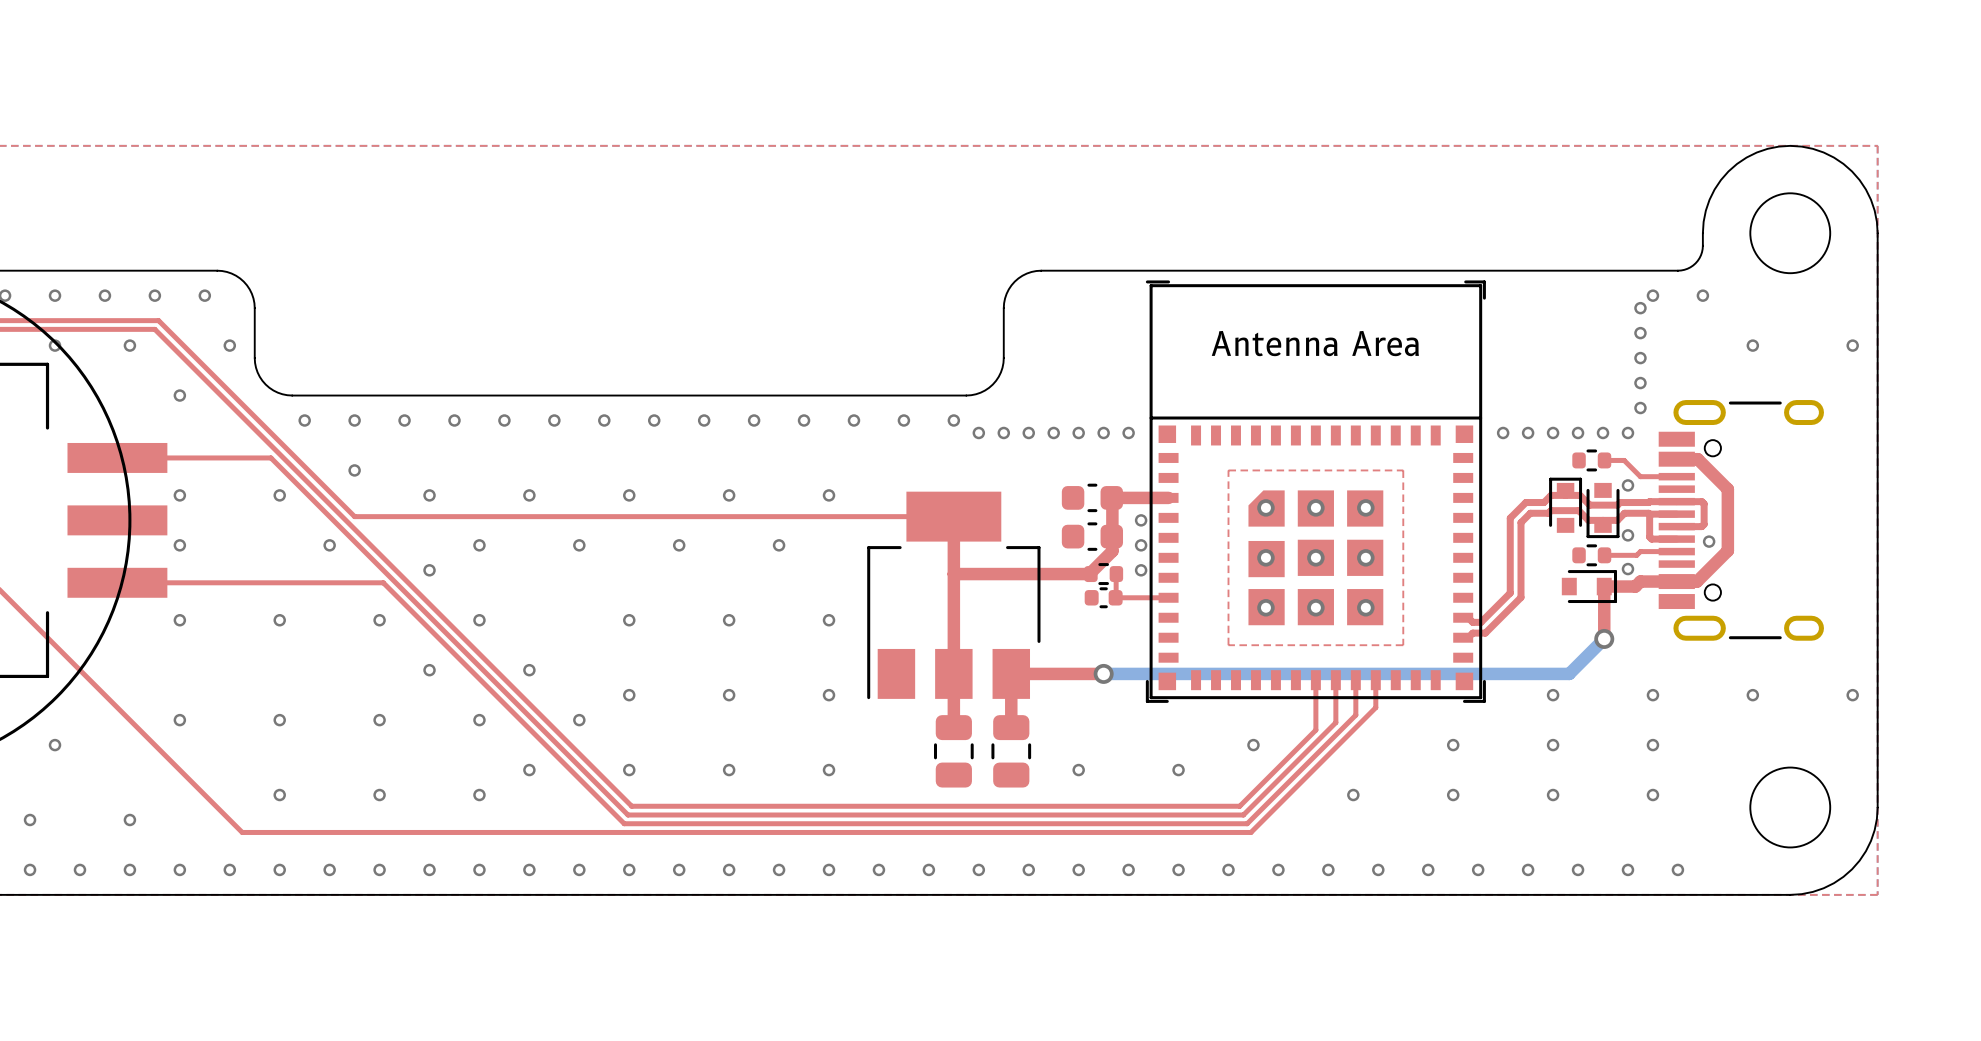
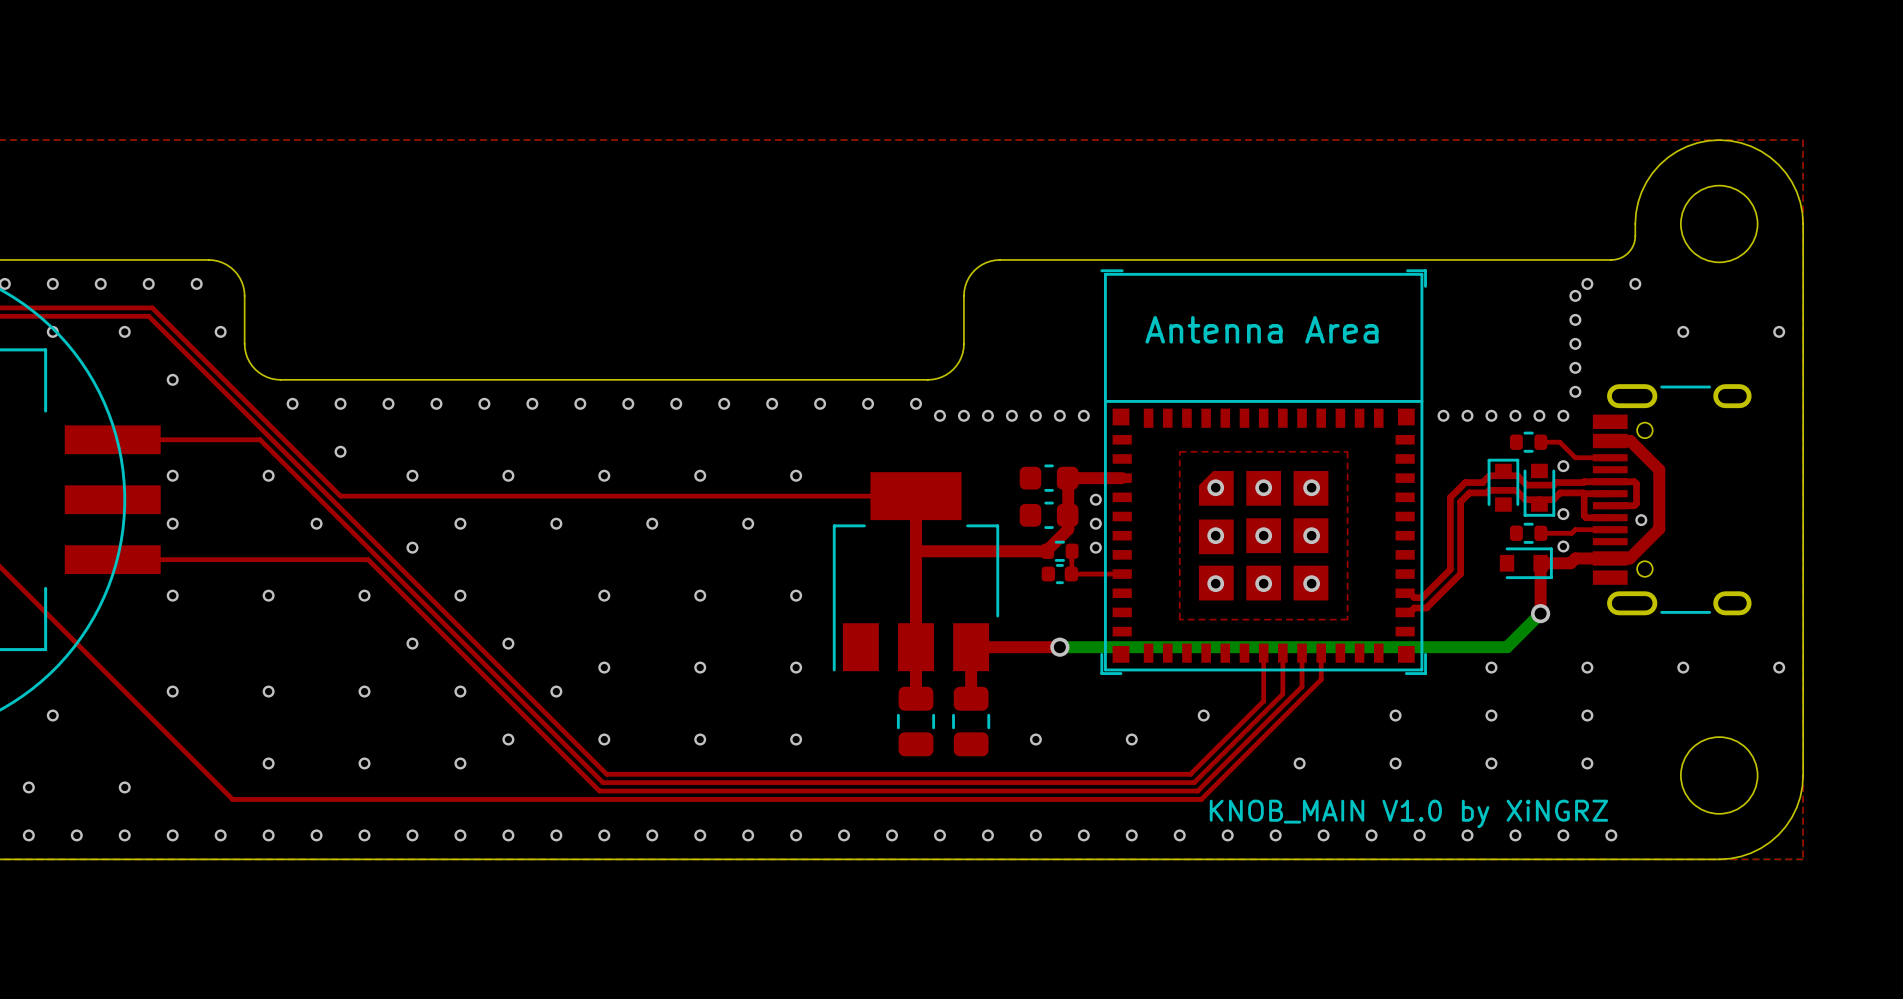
text: none -> KNOB_MAIN V1.0 by XiNGRZ (1408, 813)

